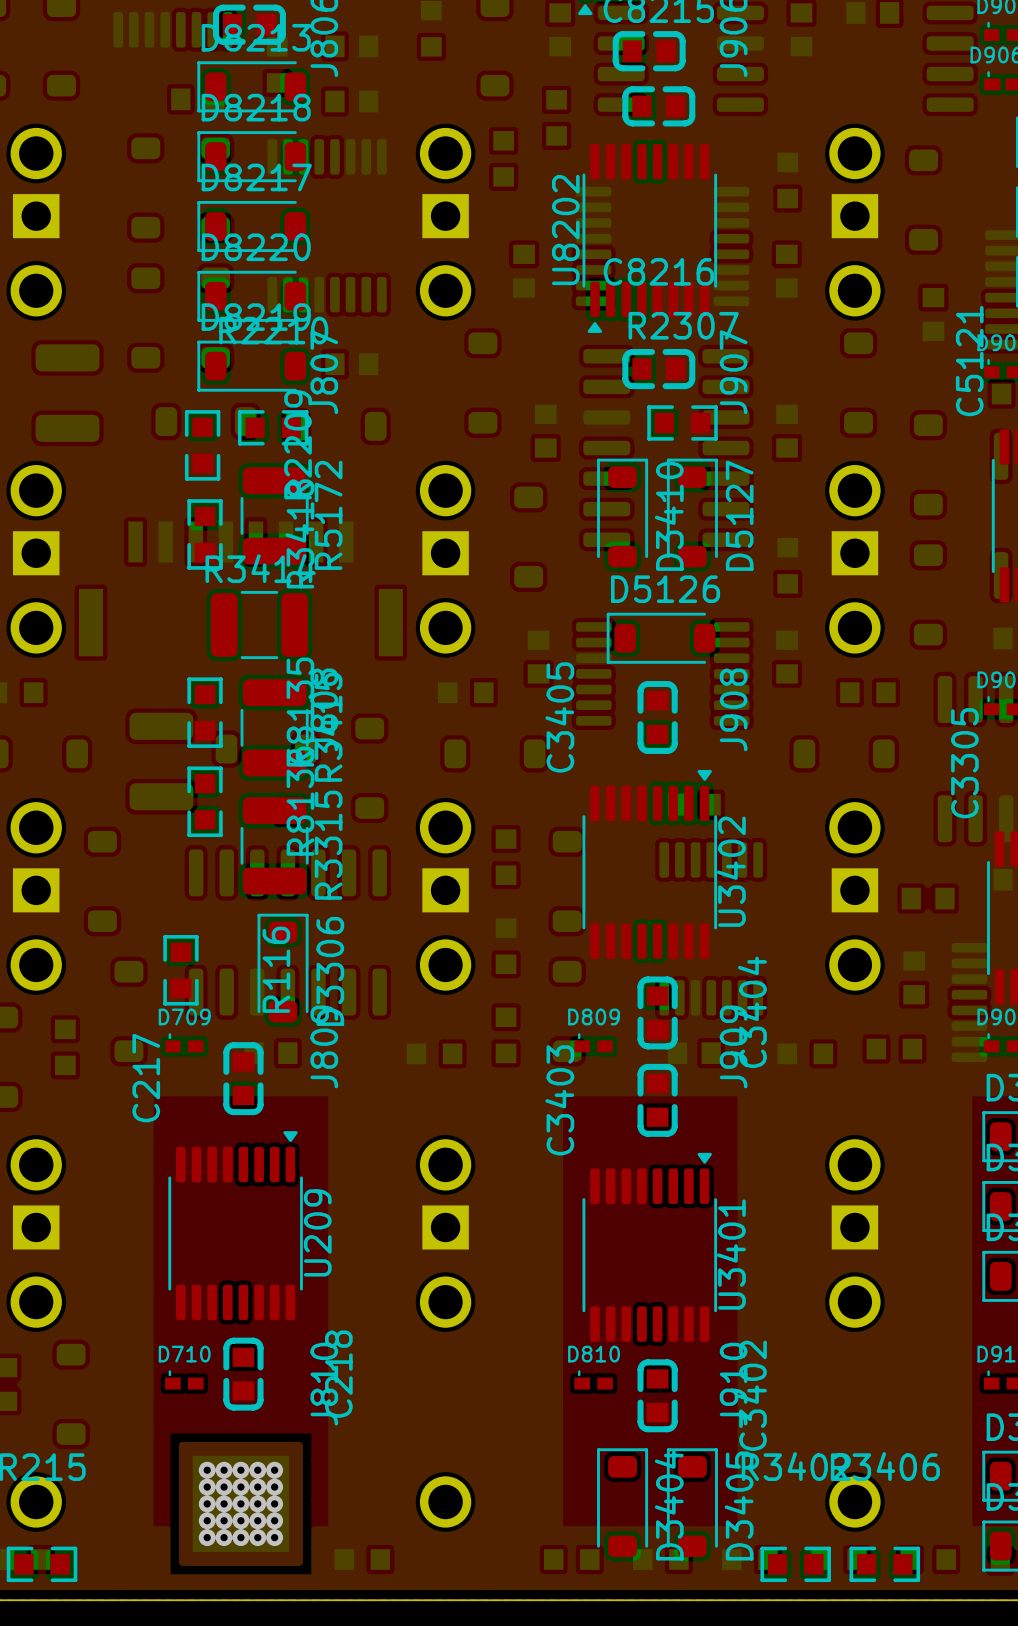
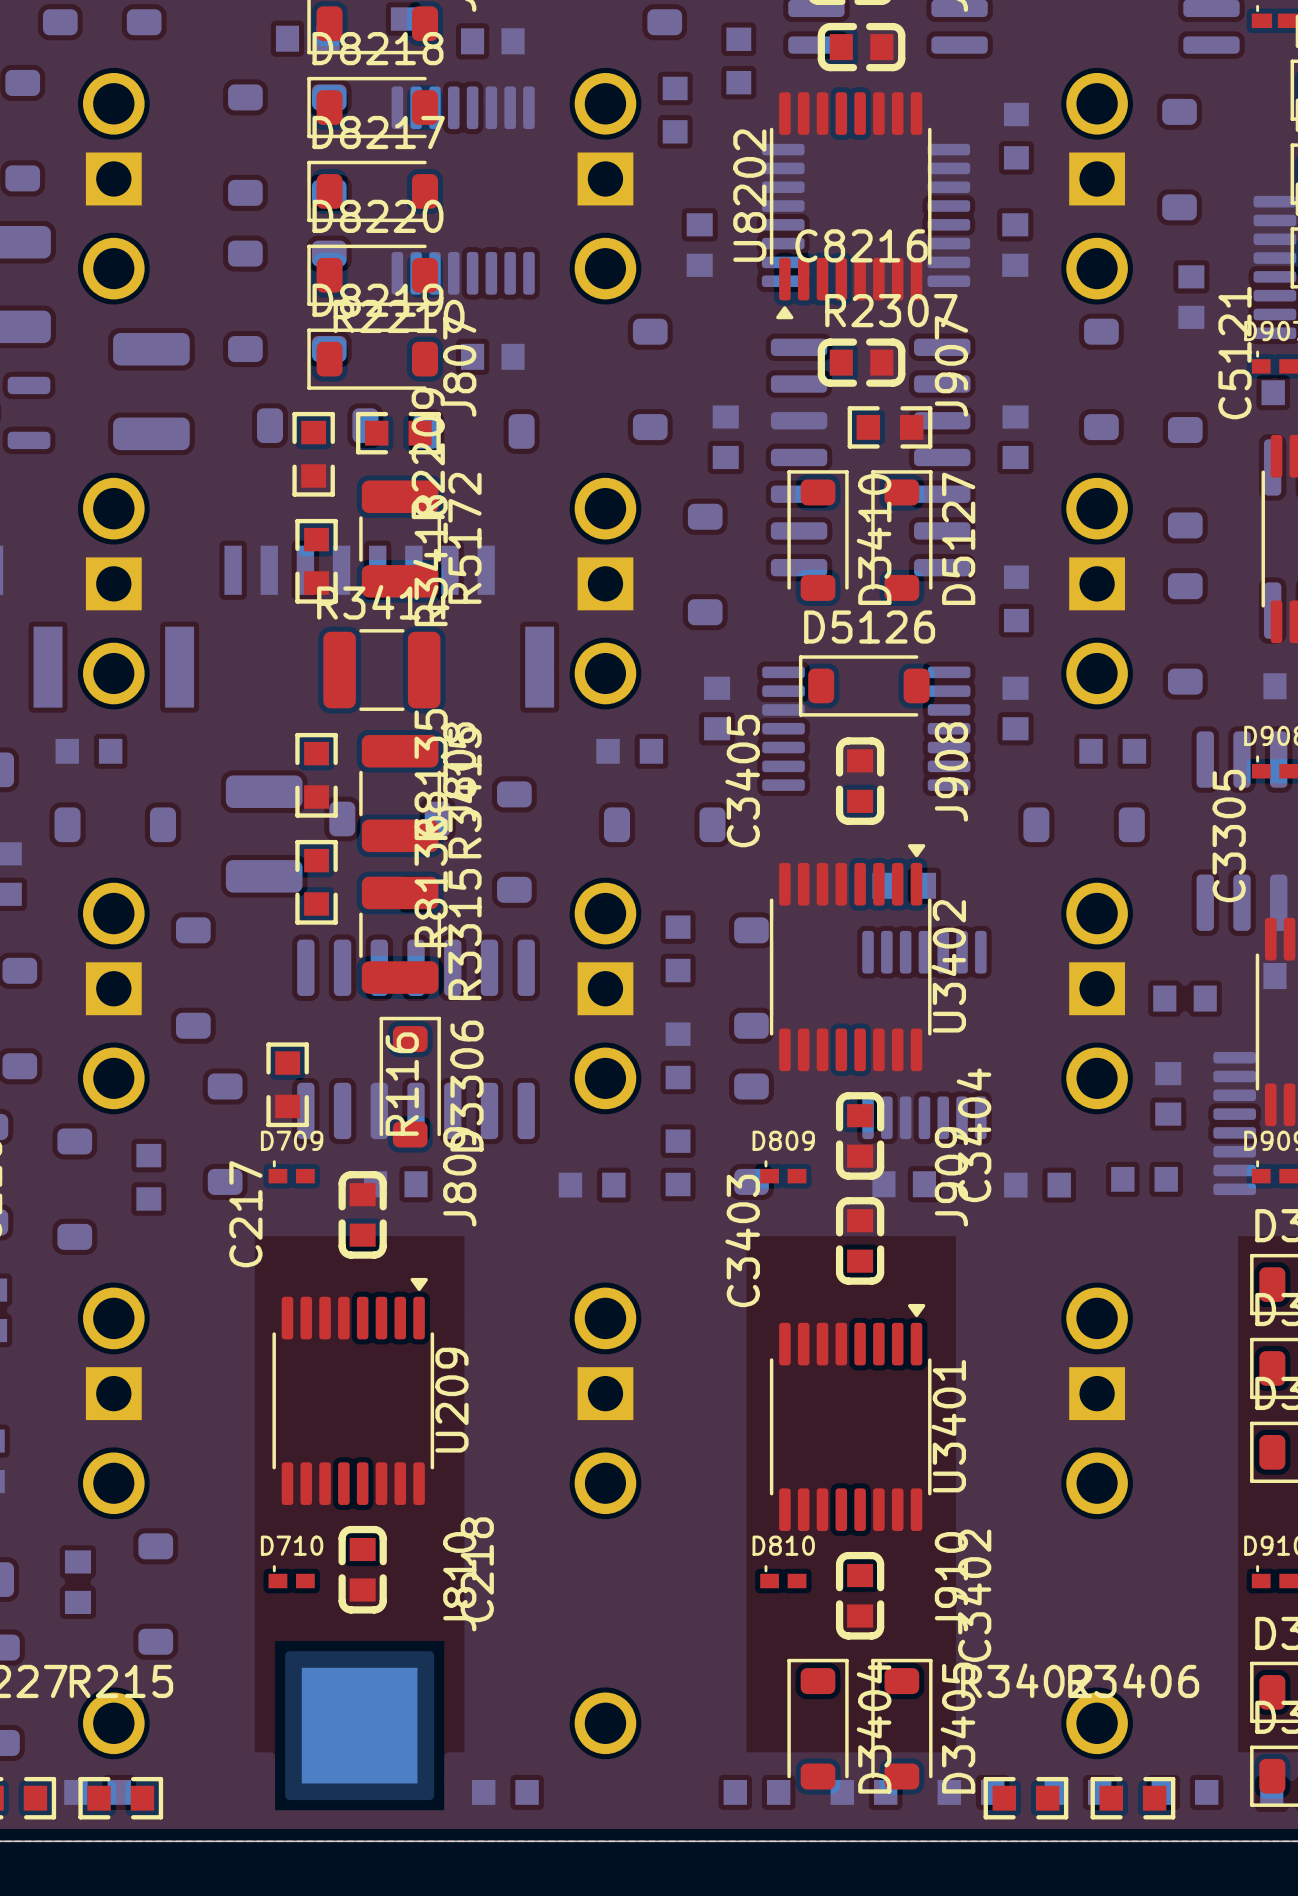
via: (207, 1470) -> none
via: (224, 1470) -> none
via: (240, 1470) -> none
via: (257, 1470) -> none
via: (274, 1470) -> none
via: (207, 1487) -> none
via: (224, 1487) -> none
via: (240, 1487) -> none
via: (257, 1487) -> none
via: (274, 1487) -> none
via: (207, 1503) -> none
via: (224, 1503) -> none
via: (240, 1503) -> none
via: (257, 1503) -> none
via: (274, 1503) -> none
via: (207, 1520) -> none
via: (224, 1520) -> none
via: (240, 1520) -> none
via: (257, 1520) -> none
via: (274, 1520) -> none
via: (207, 1537) -> none
via: (224, 1537) -> none
via: (240, 1537) -> none
via: (257, 1537) -> none
via: (274, 1537) -> none

